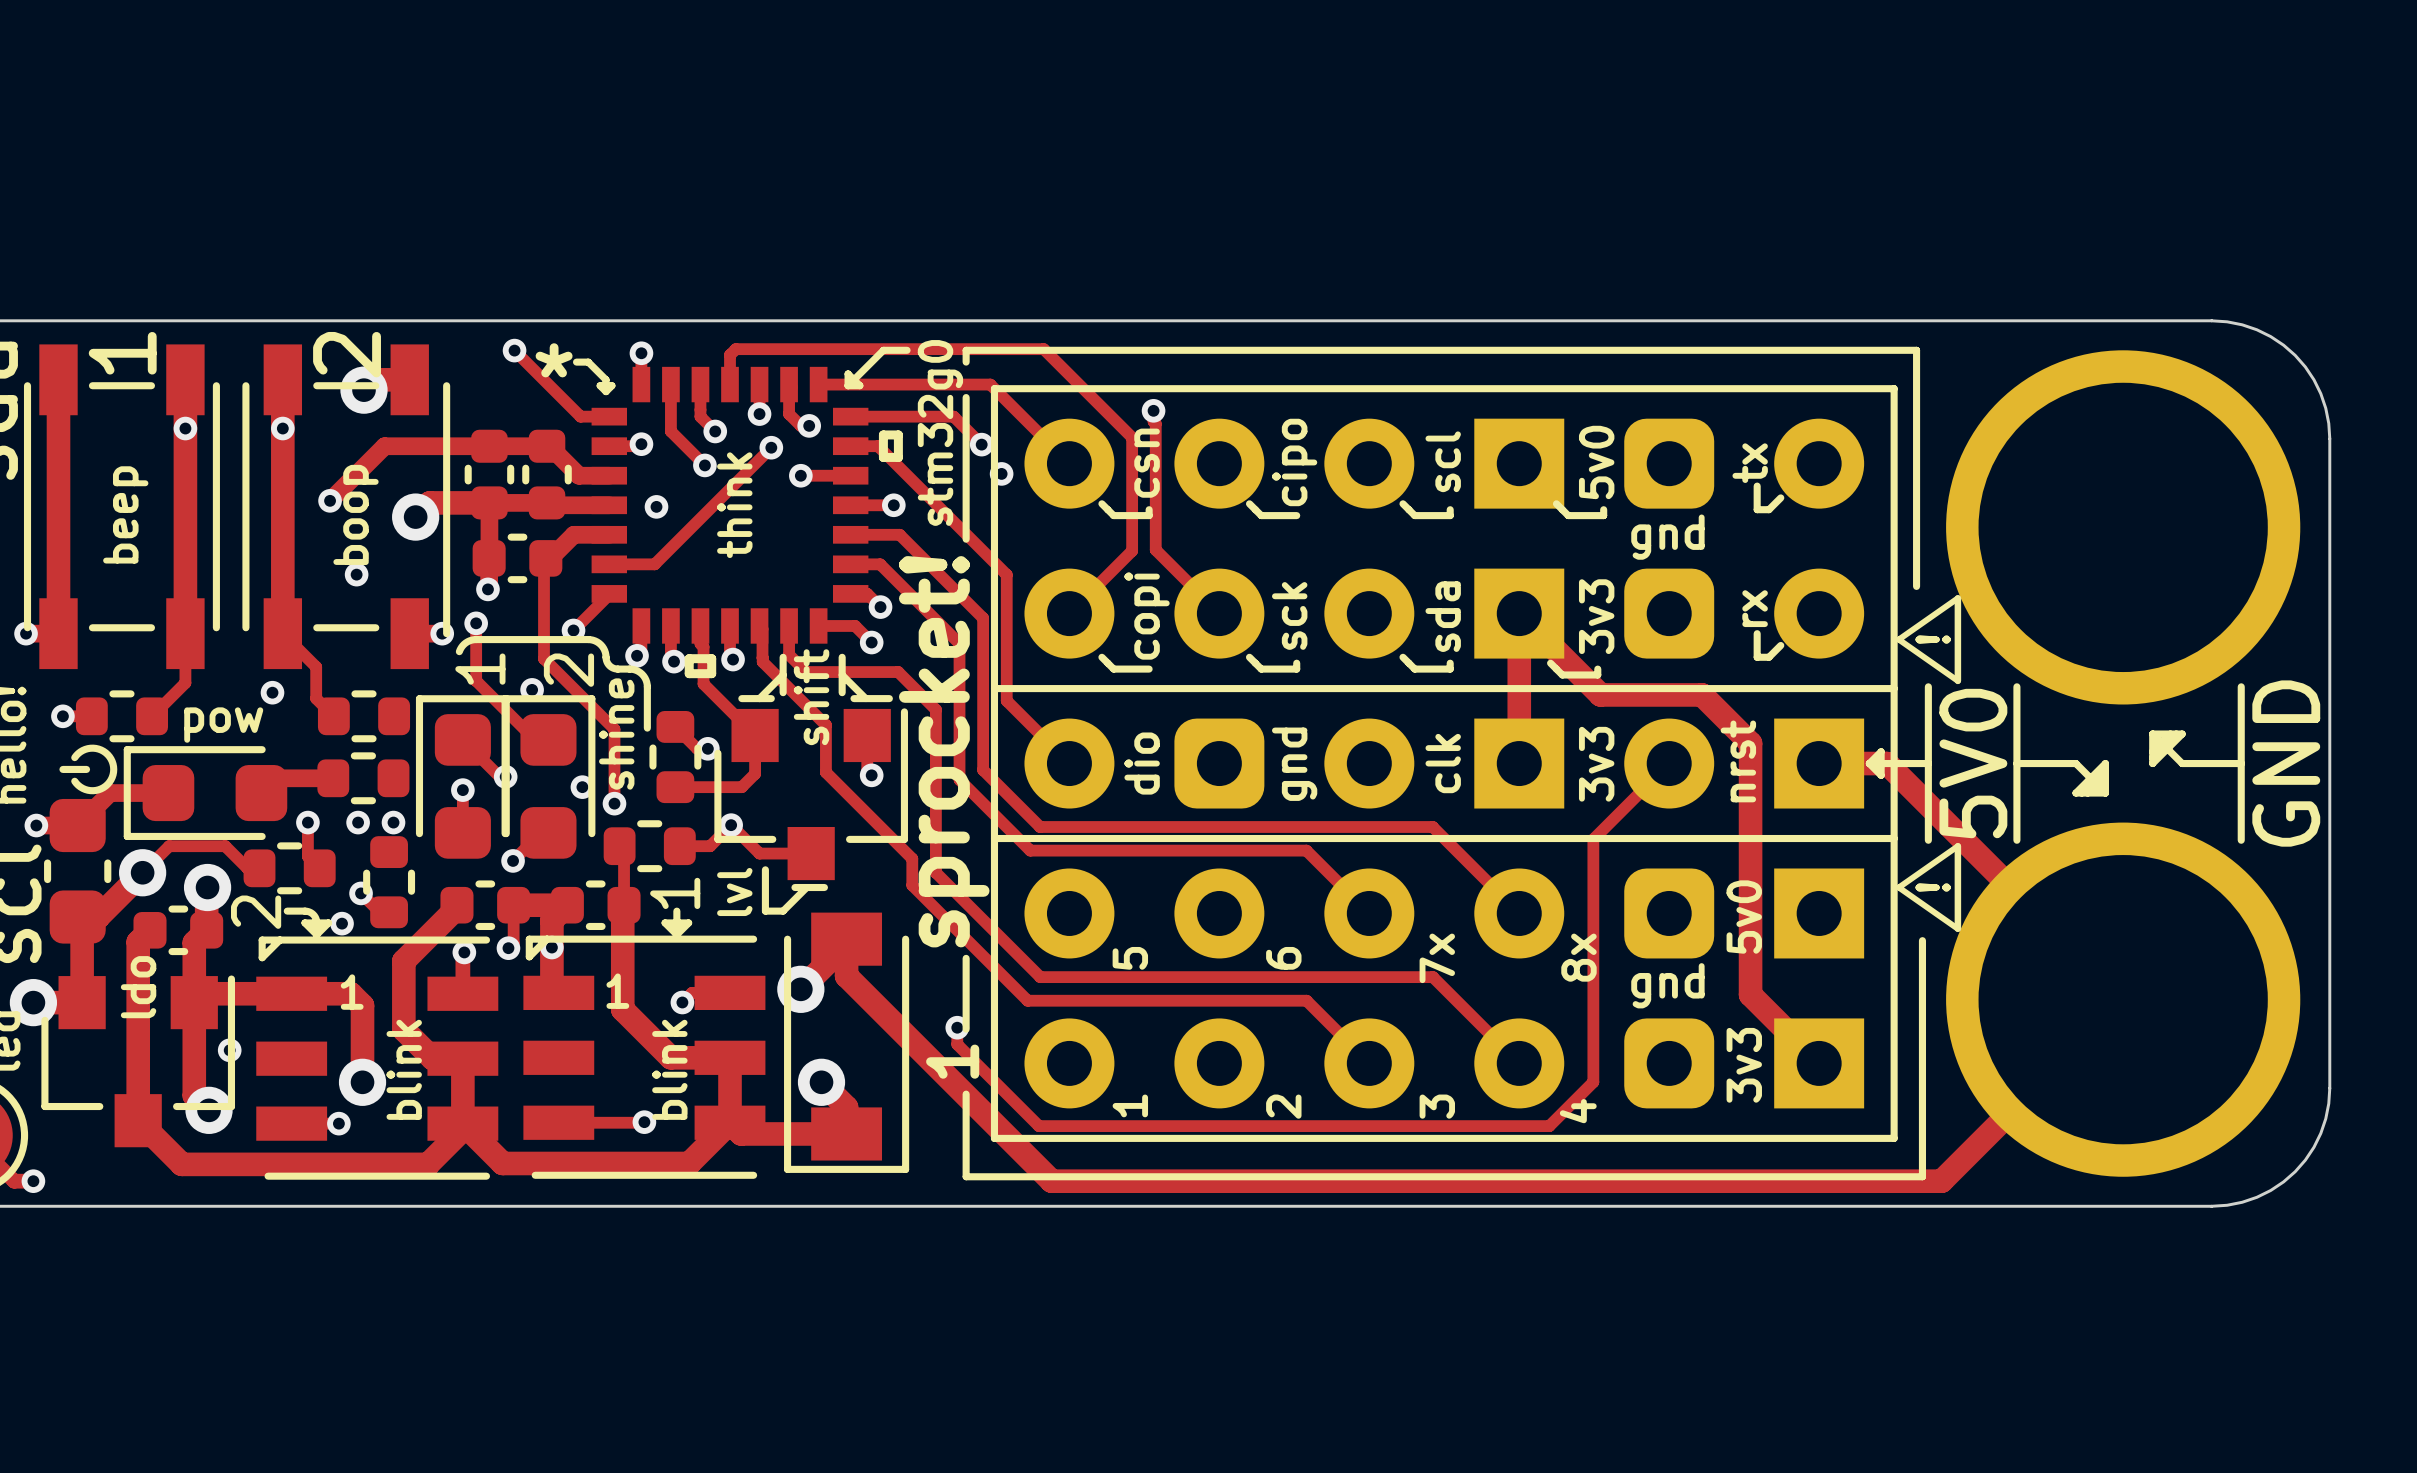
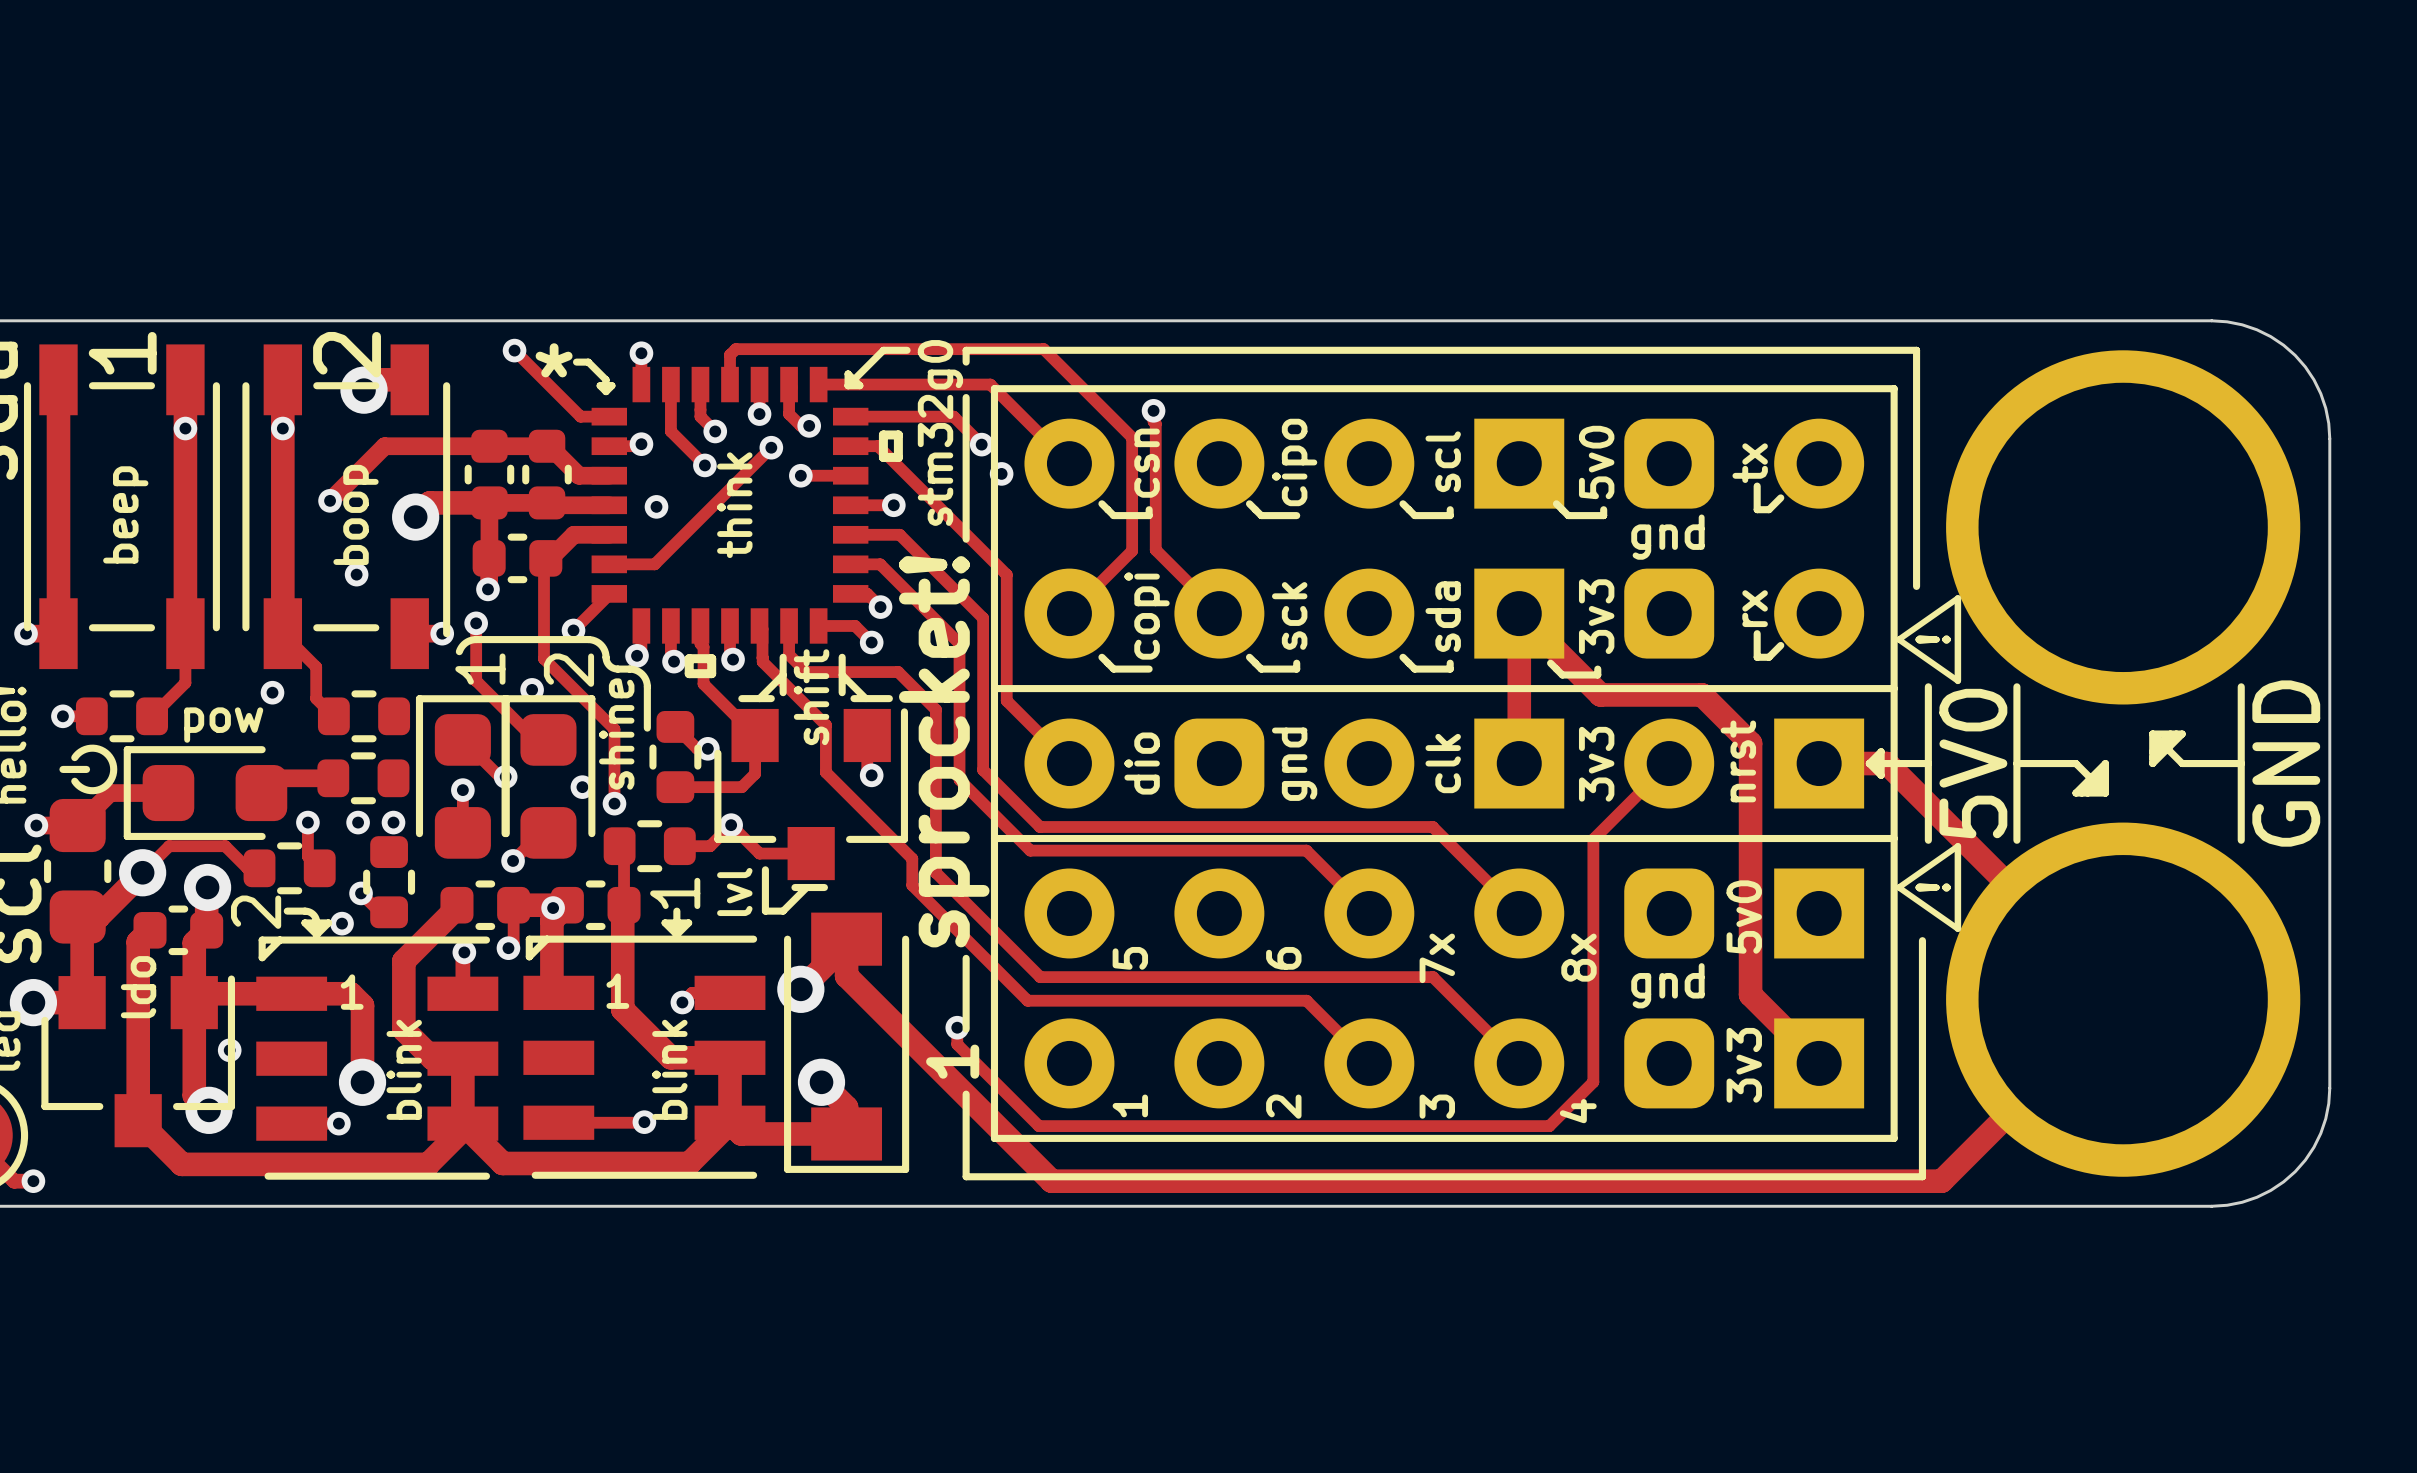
via position: (551, 947) -> (553, 908)

